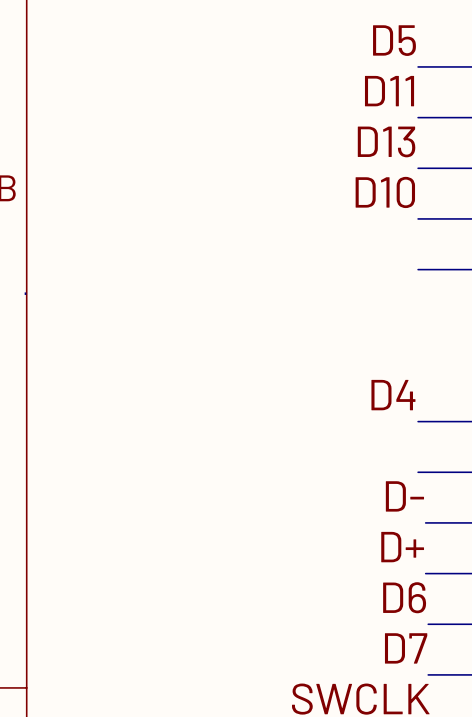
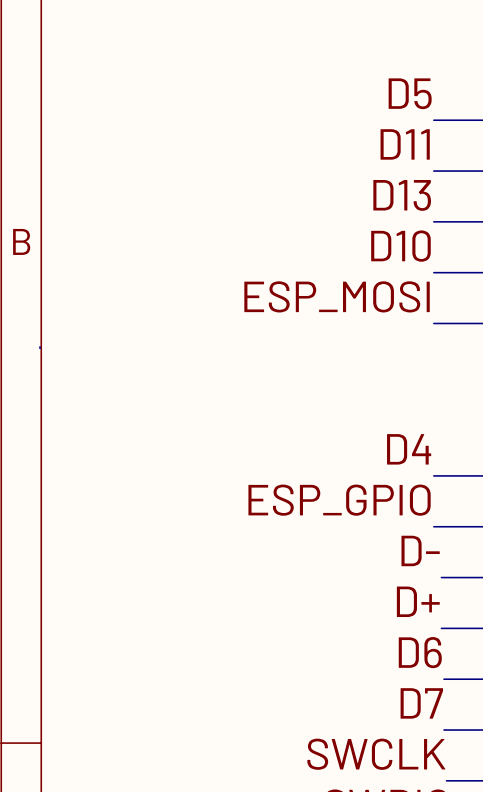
label: none -> ESP_MOSI (337, 296)
label: none -> ESP_GPIO (339, 500)

